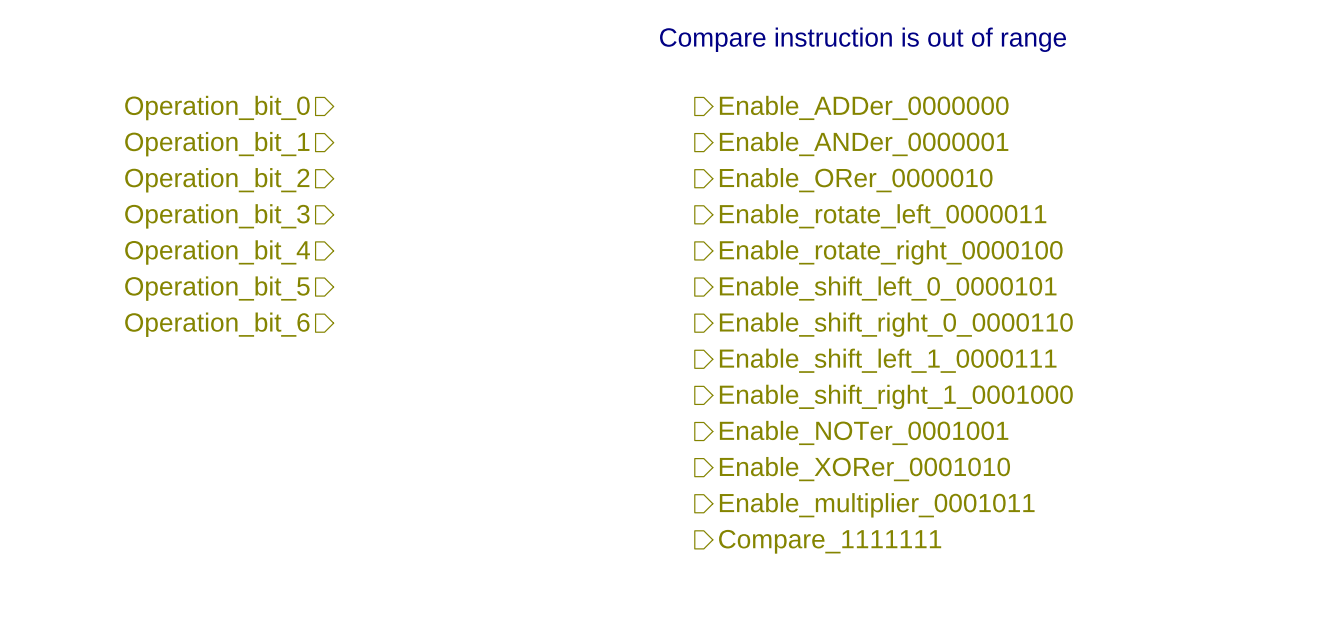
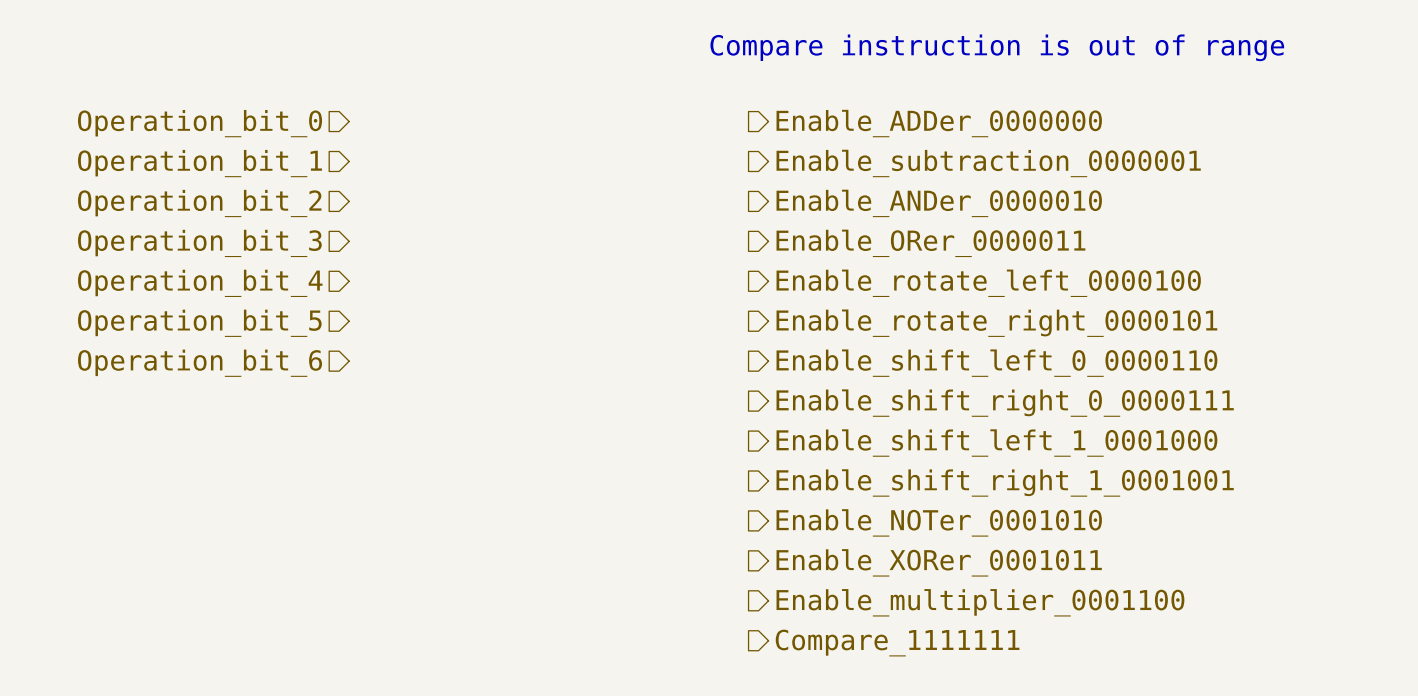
hierarchical label: Enable_ANDer_0000001 (864, 144) -> Enable_subtraction_0000001 (988, 163)
hierarchical label: Enable_ORer_0000010 (856, 180) -> Enable_ANDer_0000010 (939, 203)
hierarchical label: Enable_rotate_left_0000011 (883, 216) -> Enable_ORer_0000011 (930, 243)
hierarchical label: Enable_rotate_right_0000100 (891, 252) -> Enable_rotate_left_0000100 (988, 283)
hierarchical label: Enable_shift_left_0_0000101 (888, 288) -> Enable_rotate_right_0000101 (996, 323)
hierarchical label: Enable_shift_right_0_0000110 (896, 324) -> Enable_shift_left_0_0000110 (996, 363)
hierarchical label: Enable_shift_left_1_0000111 (888, 360) -> Enable_shift_right_0_0000111 (1005, 403)
hierarchical label: Enable_shift_right_1_0001000 (896, 396) -> Enable_shift_left_1_0001000 (996, 443)
hierarchical label: Enable_NOTer_0001001 (864, 432) -> Enable_shift_right_1_0001001 (1005, 482)
hierarchical label: Enable_XORer_0001010 (864, 469) -> Enable_NOTer_0001010 (939, 522)
hierarchical label: Enable_multiplier_0001011 (877, 505) -> Enable_XORer_0001011 (939, 562)
hierarchical label: Compare_1111111 (830, 541) -> Enable_multiplier_0001100 (980, 602)
hierarchical label: none -> Compare_1111111 (897, 643)

